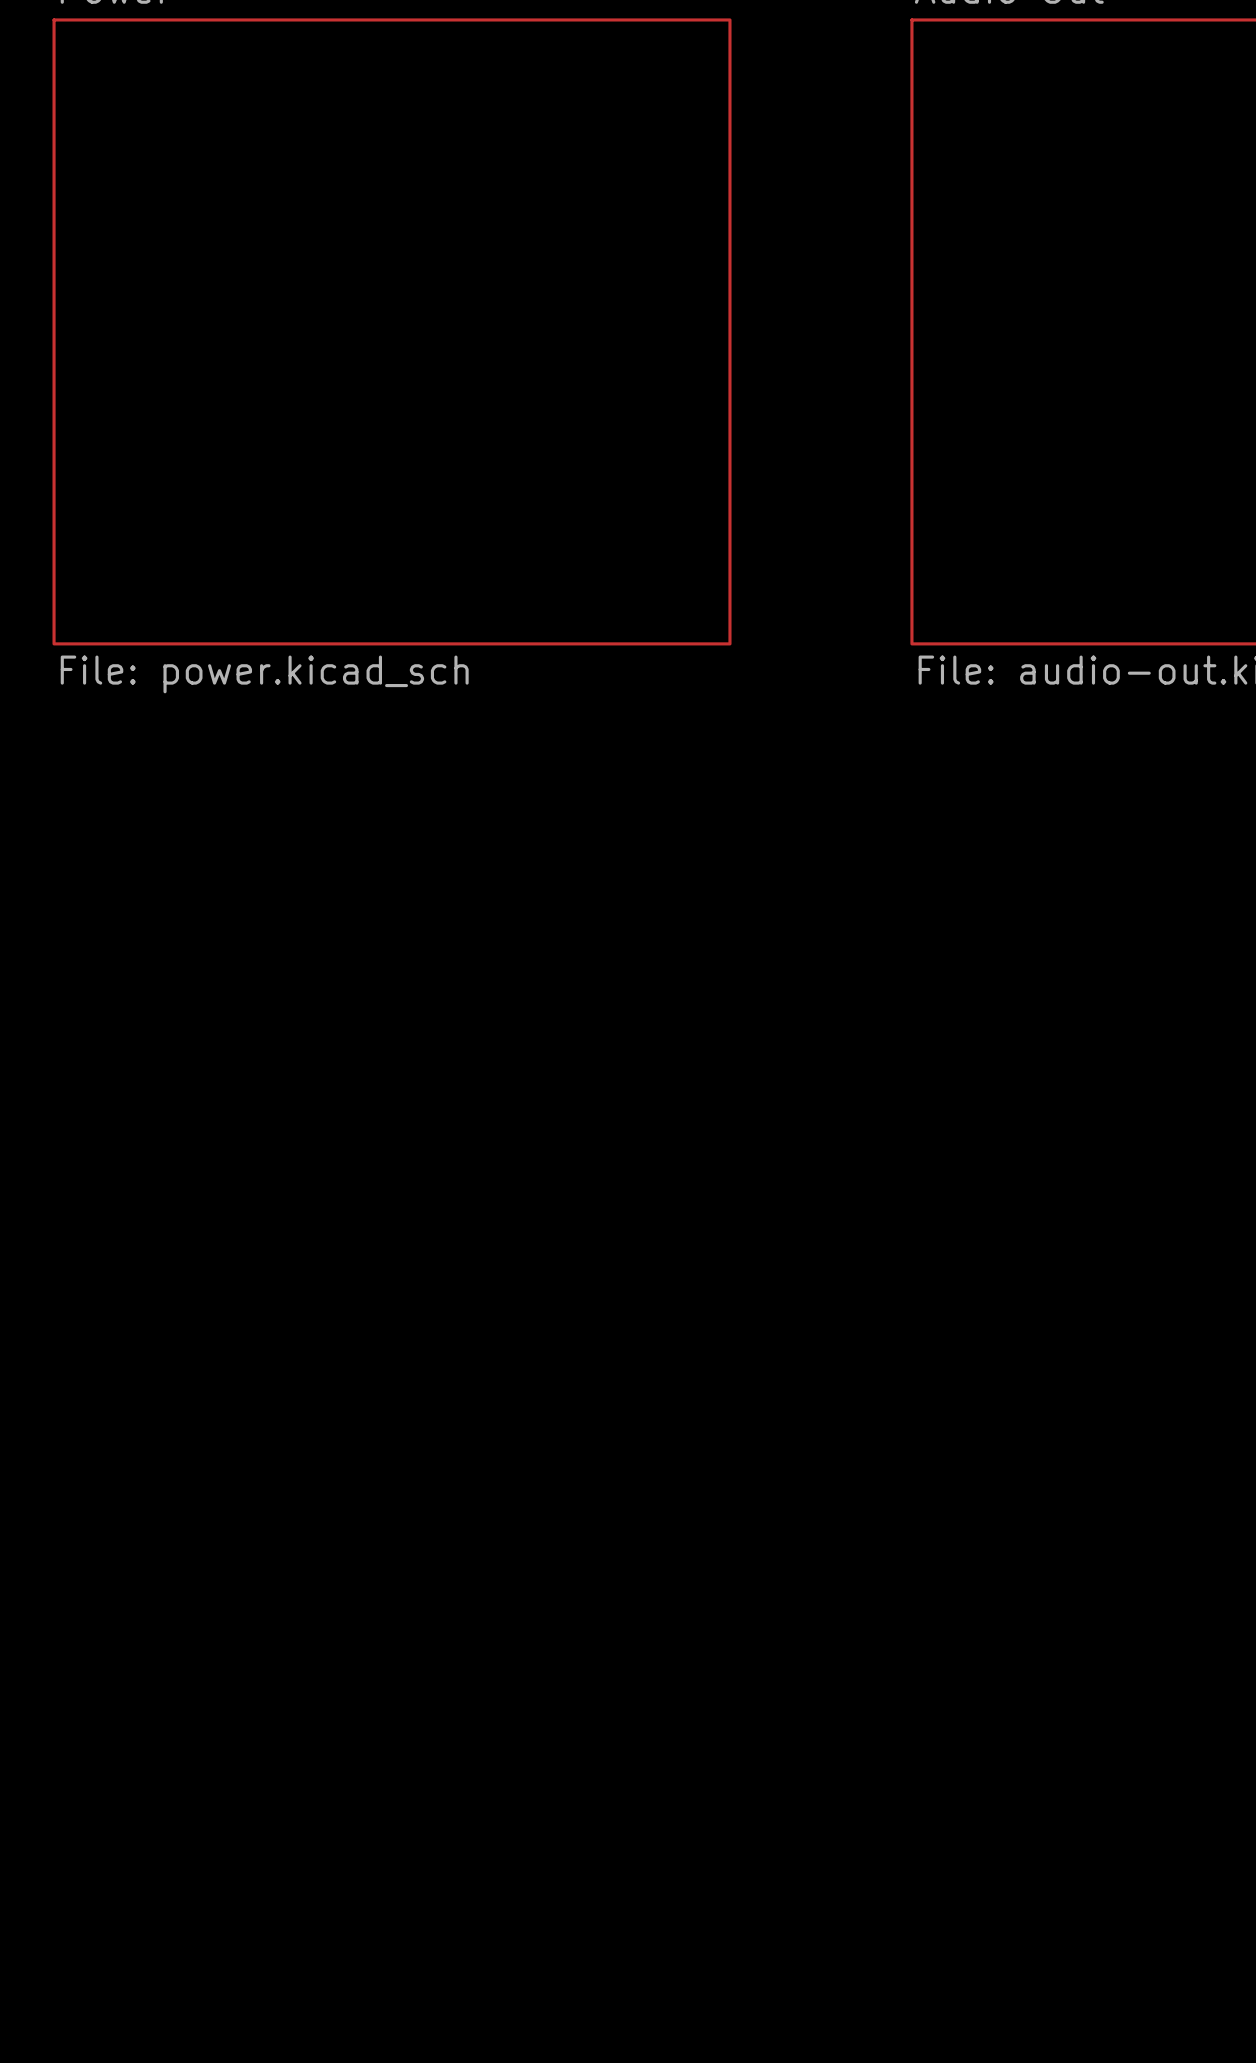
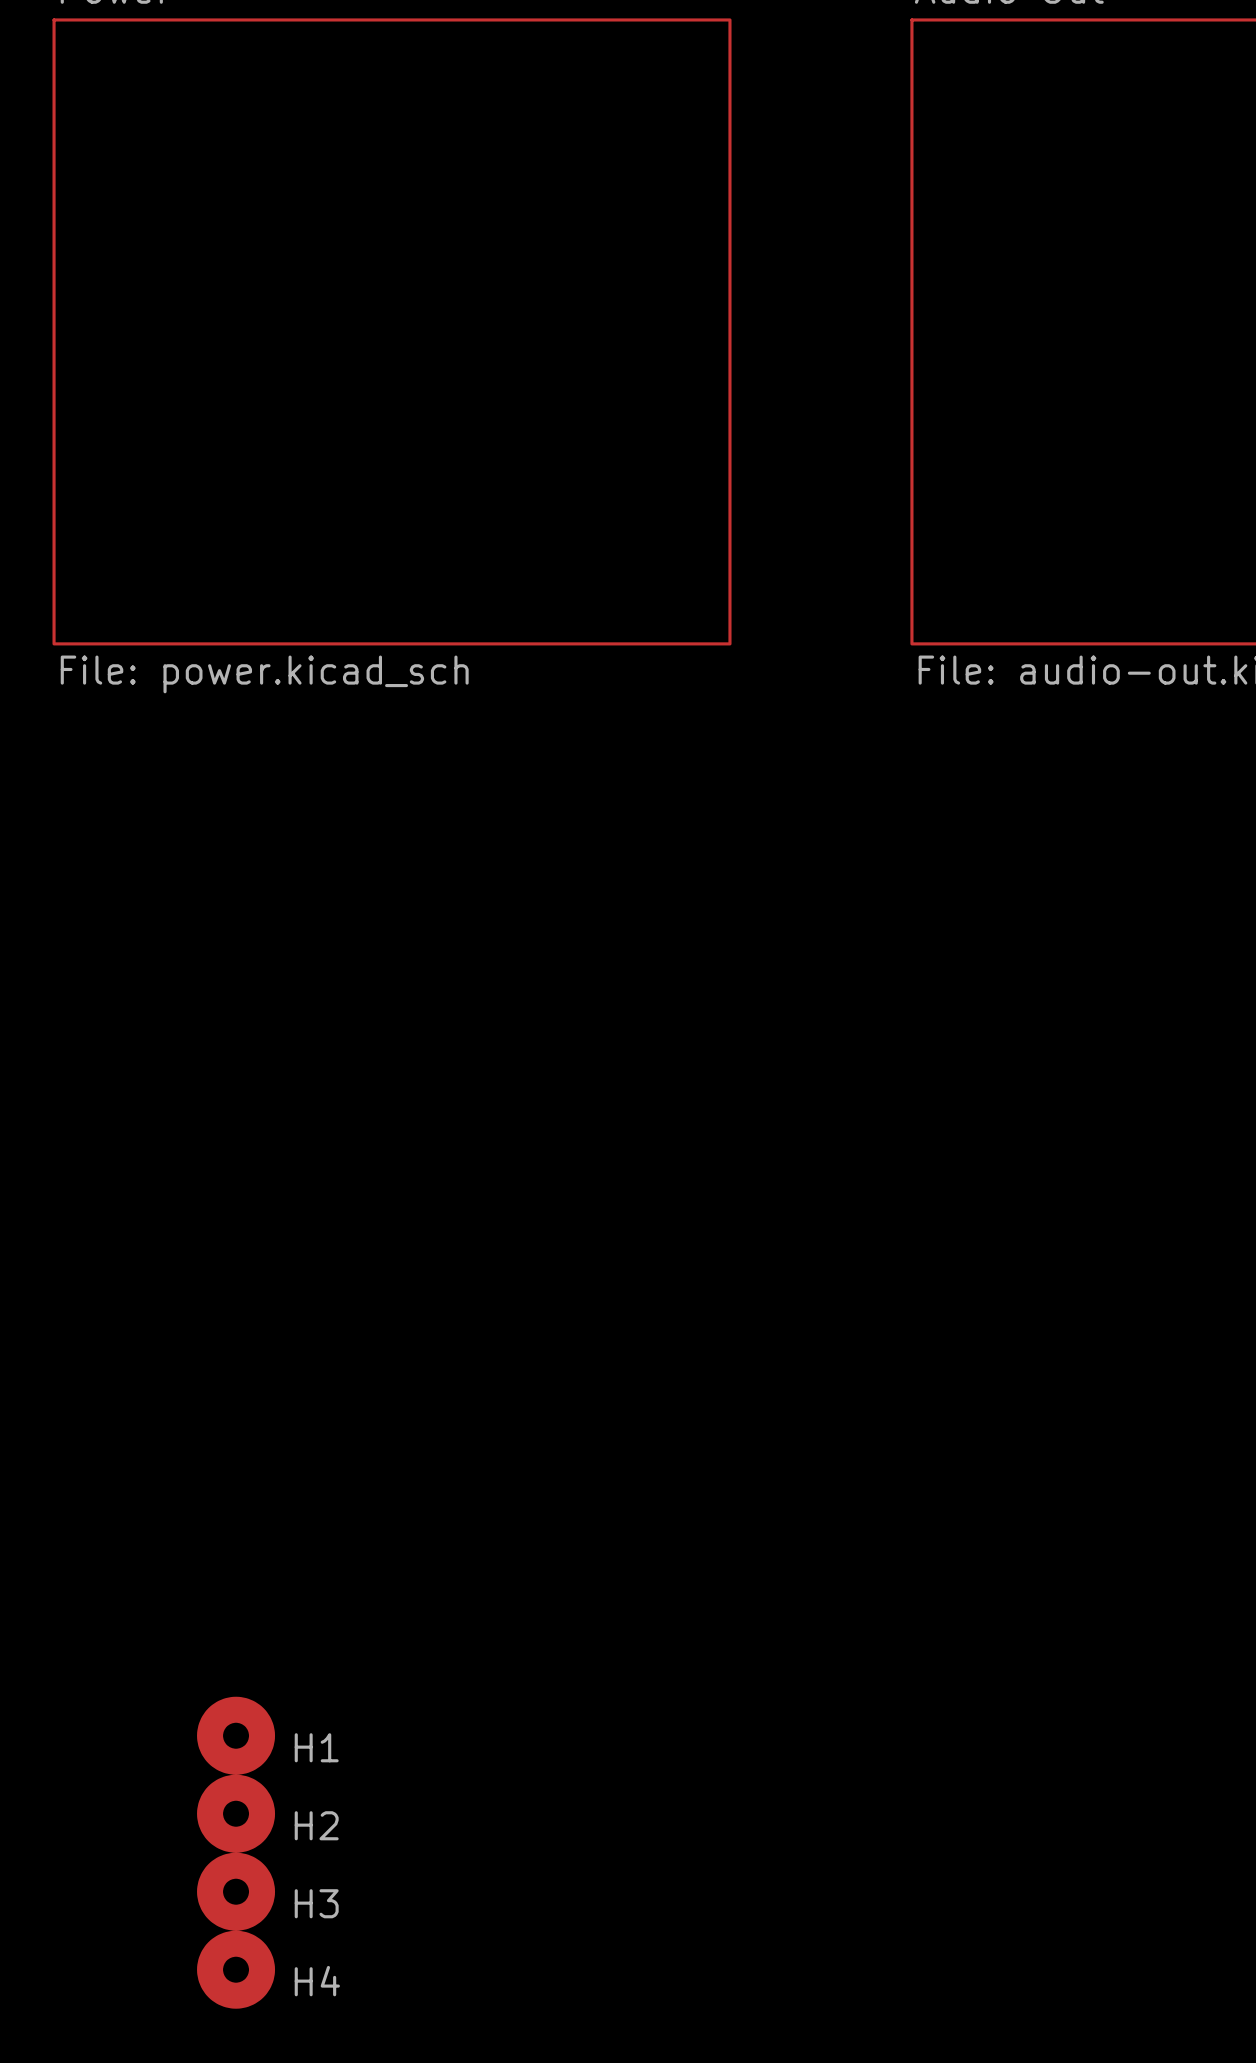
H1: none -> (236, 1735)
H2: none -> (236, 1813)
H3: none -> (236, 1891)
H4: none -> (236, 1969)

